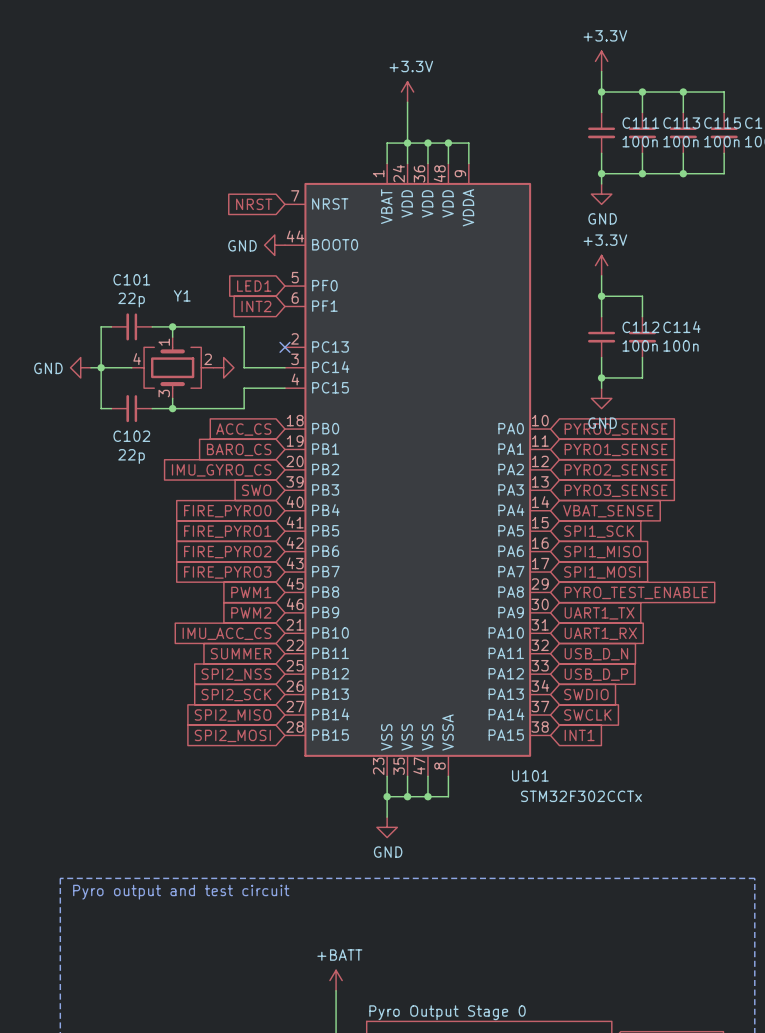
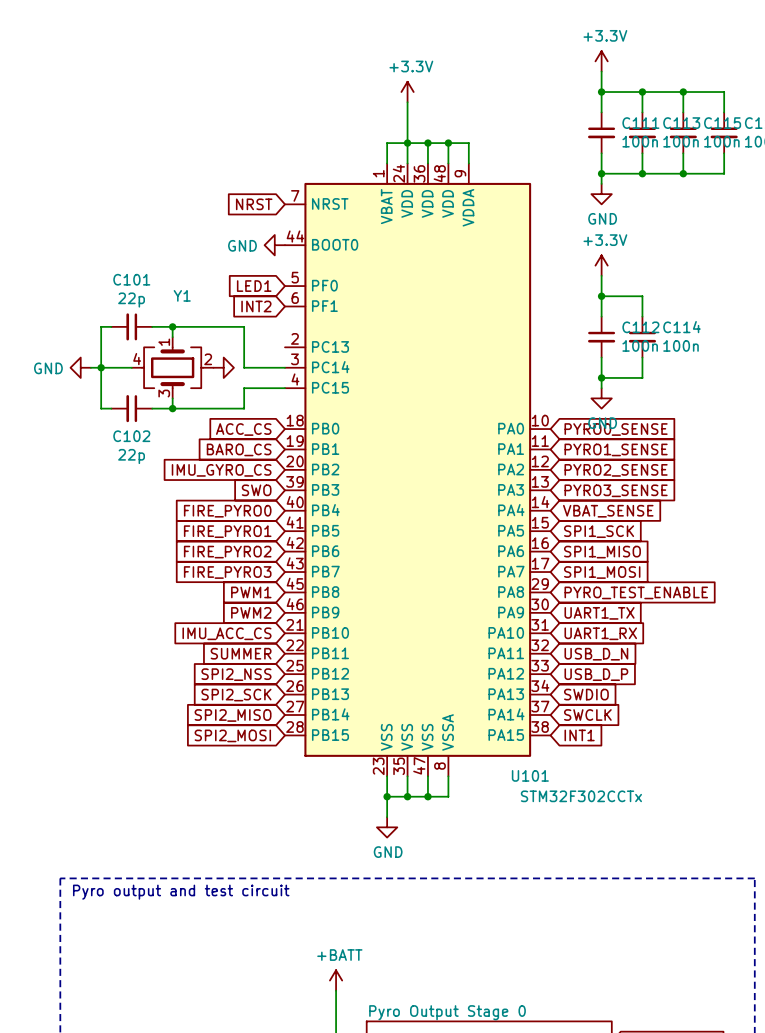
no-connect mark: (284, 347) -> none

